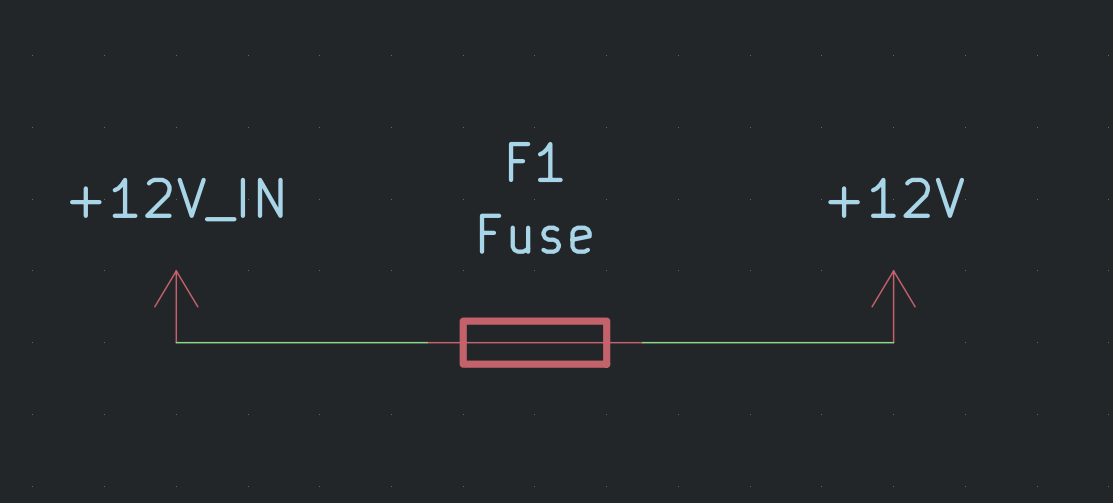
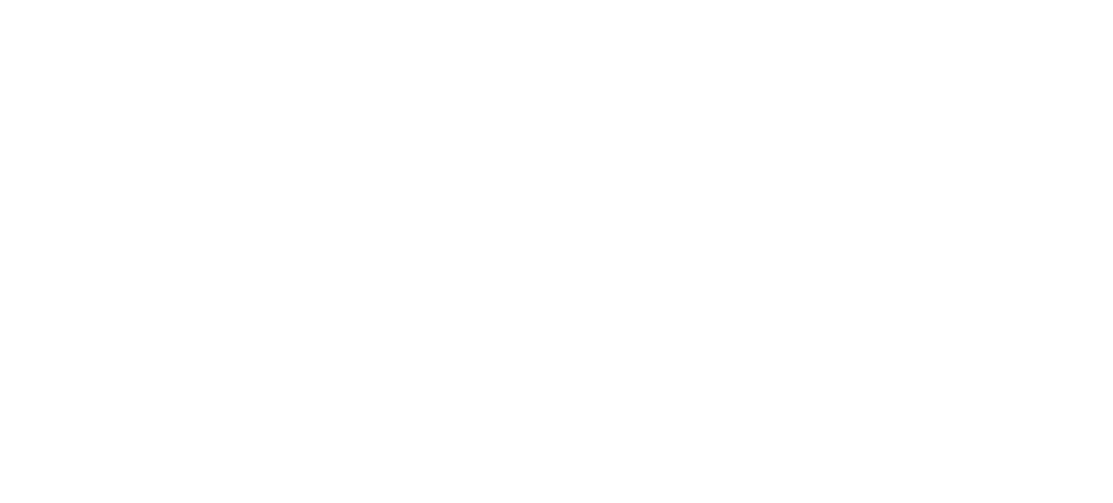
power symbol: +12V_IN (176, 306) -> none
power symbol: +12V (893, 306) -> none
wire: (176, 342) (427, 342) -> none
F1: Fuse (534, 342) -> none
wire: (642, 342) (893, 342) -> none

